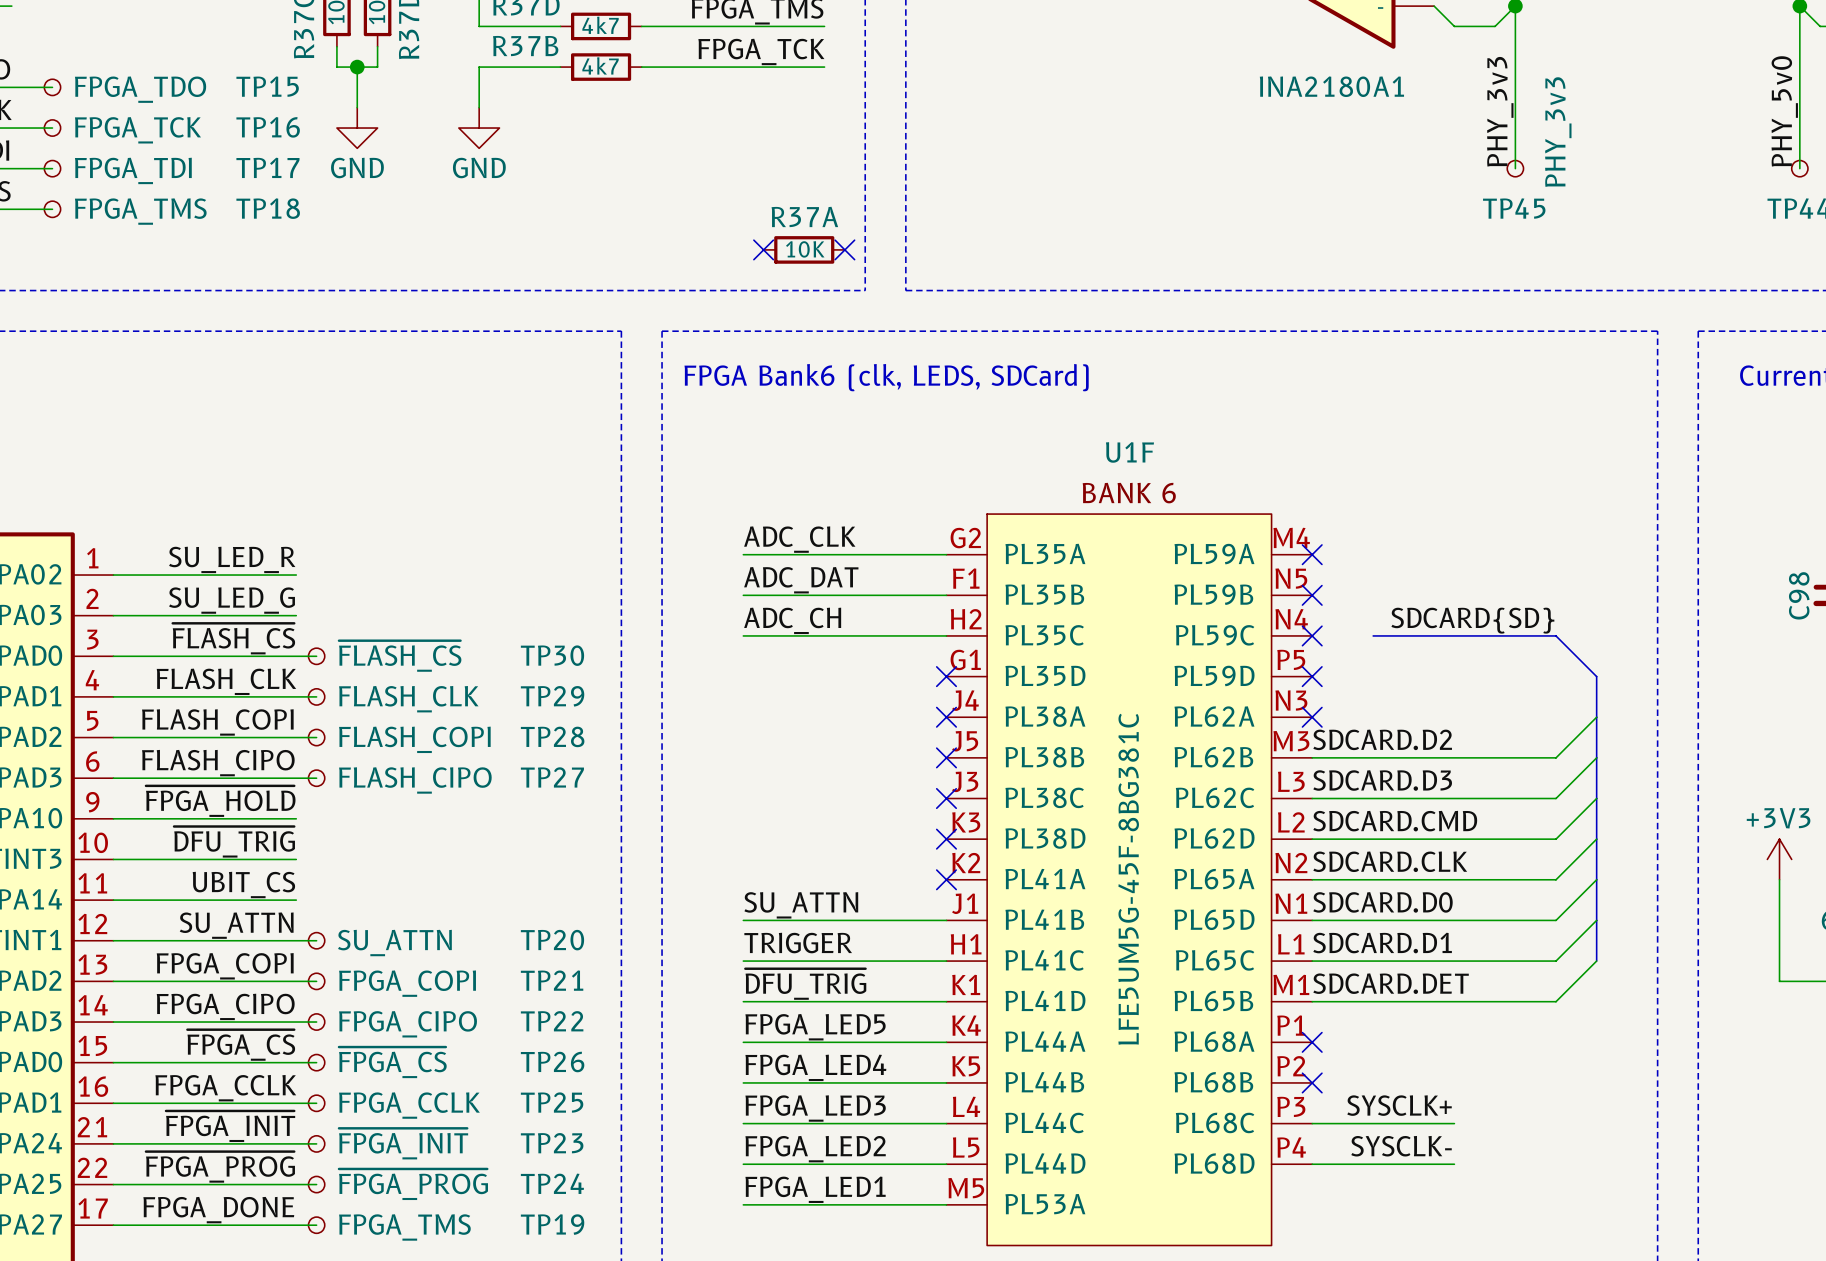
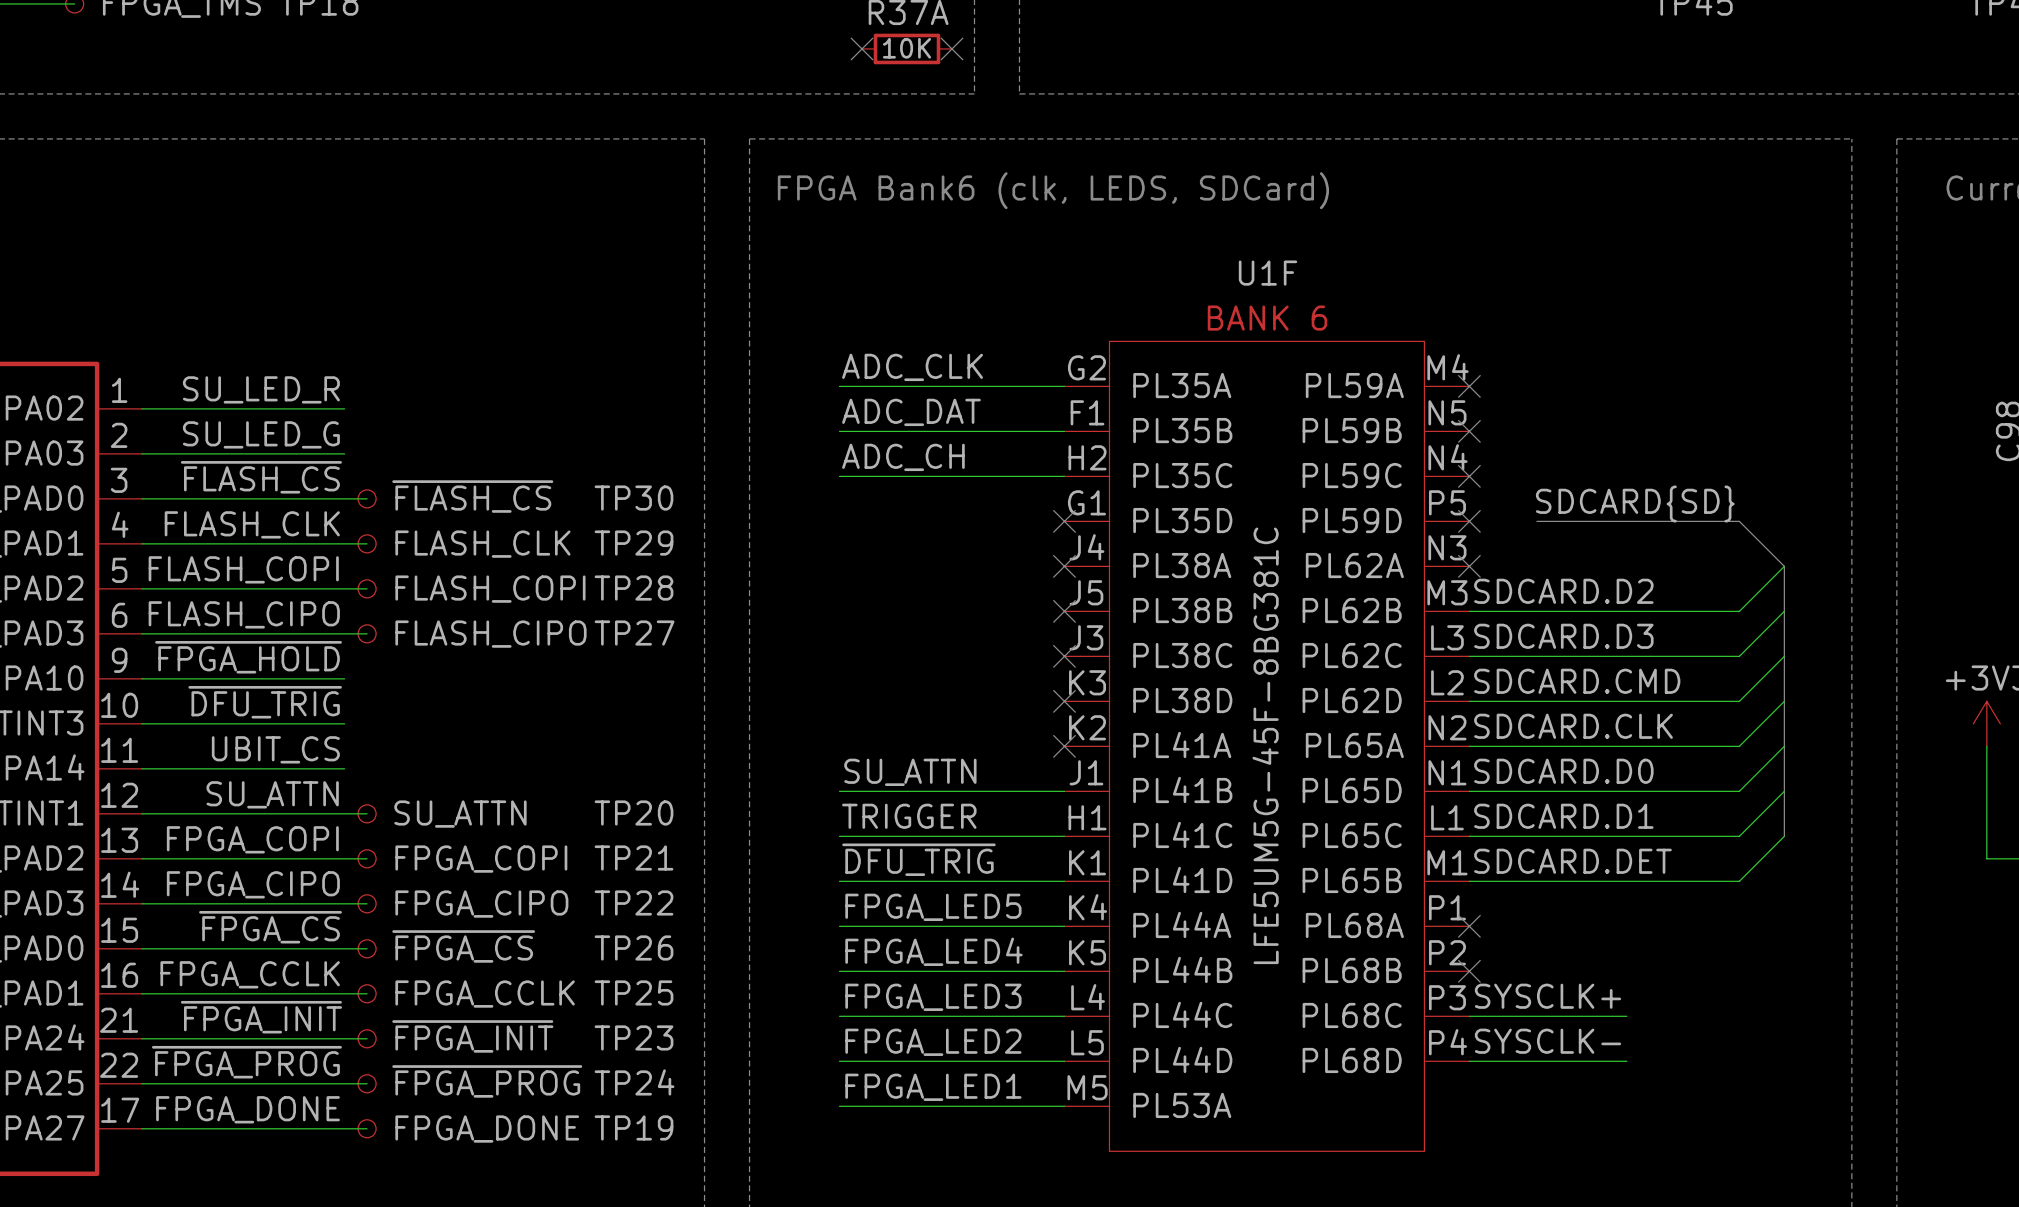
label position: SDCARD{SD} (1472, 620) -> SDCARD{SD} (1635, 503)
bus: (1373, 635) (1556, 635) (1596, 676) (1596, 717) -> (1536, 521) (1739, 521) (1784, 566)
TP19 value: FPGA_TMS (404, 1227) -> FPGA_DONE (487, 1129)

